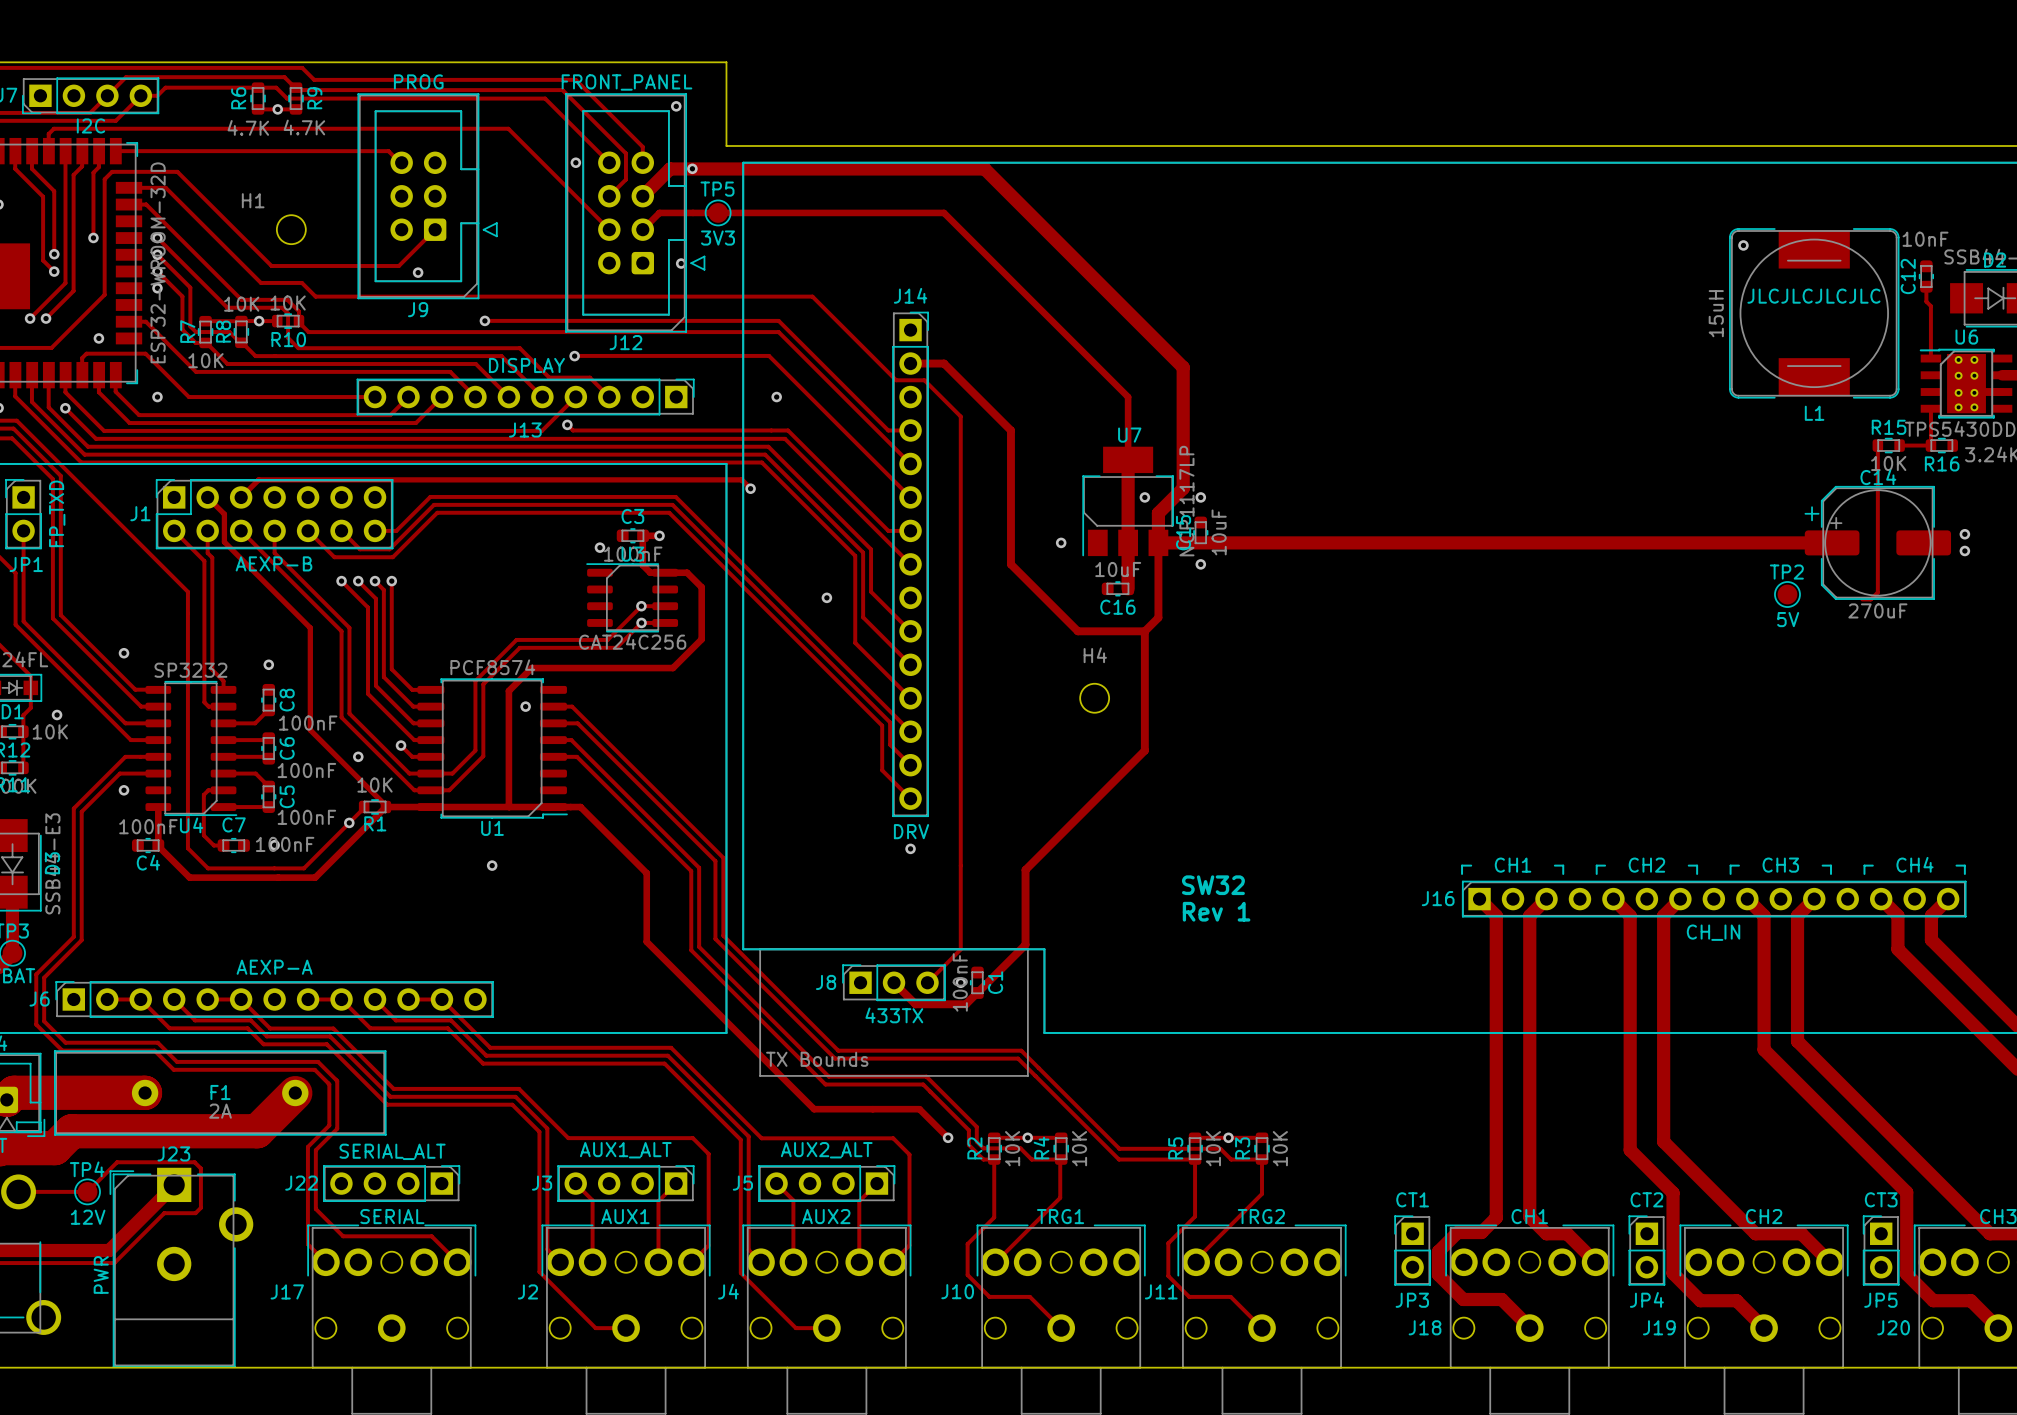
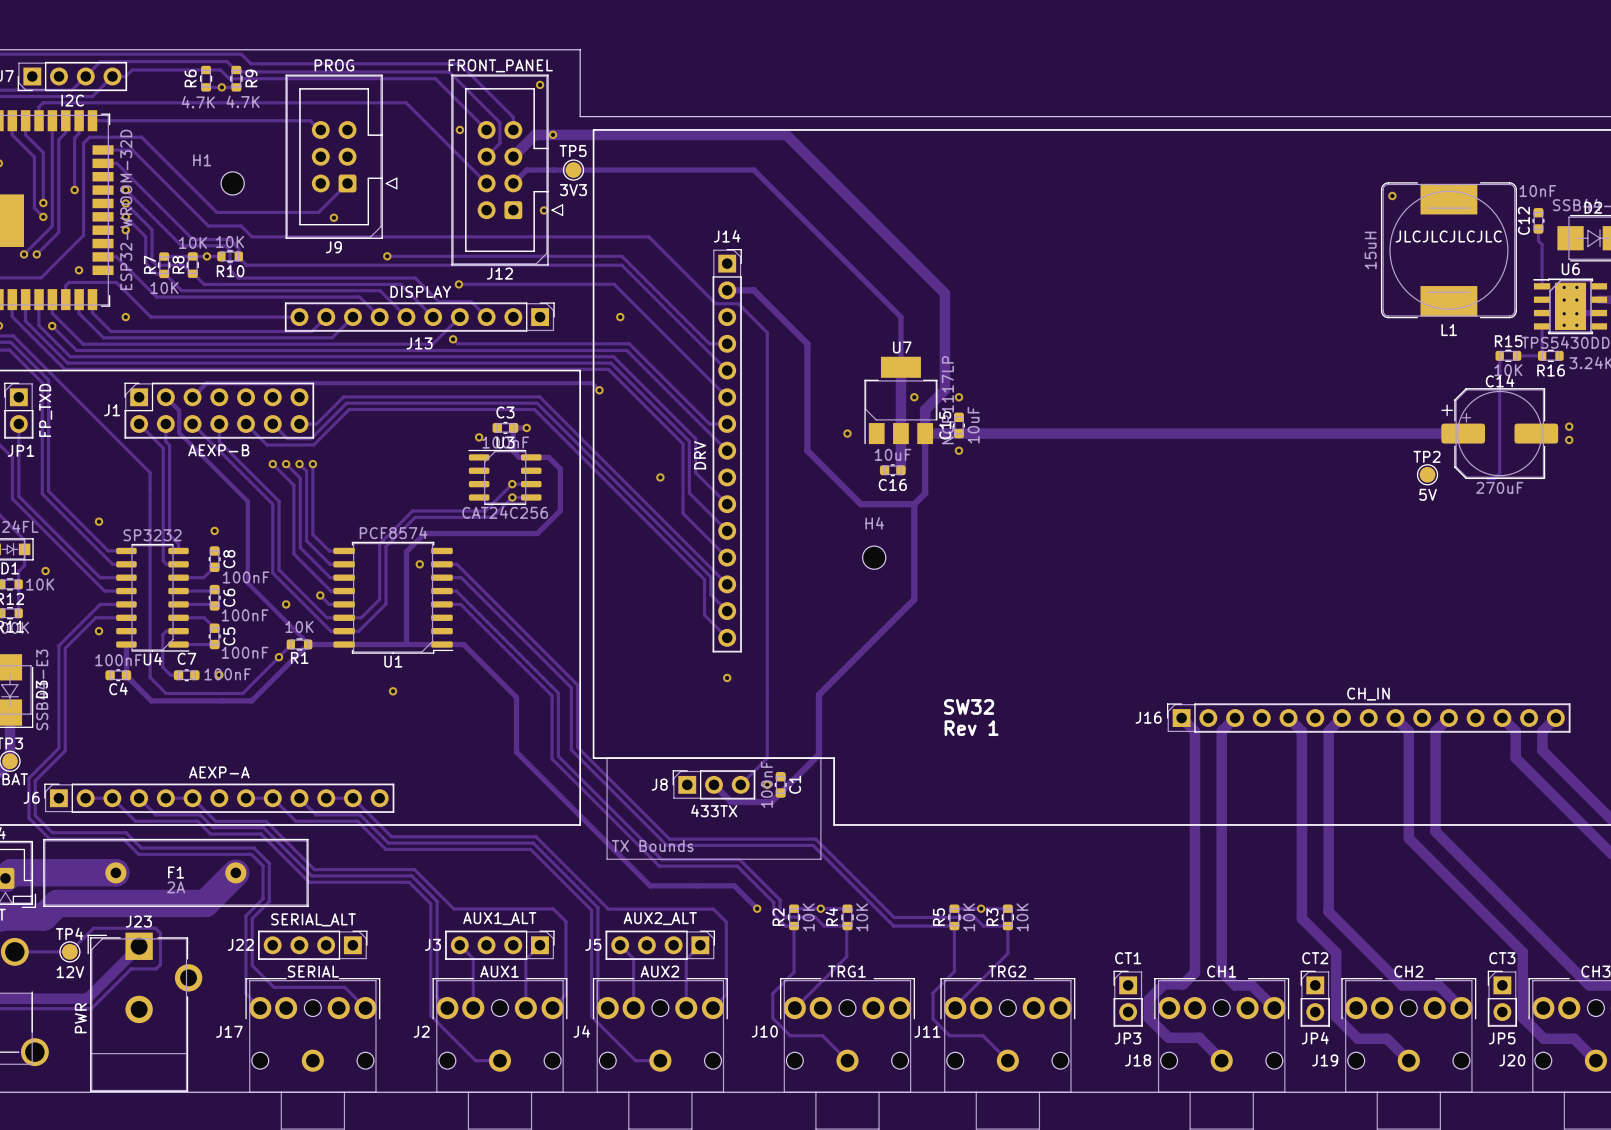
J14 value rotation: 0° (911, 831) -> 90° counterclockwise (700, 455)
J14 value position: DRV (911, 831) -> DRV (700, 455)
line: (1471, 865) (1462, 865) (1462, 873) -> none
line: (1554, 865) (1563, 865) (1563, 873) -> none
line: (1605, 865) (1596, 865) (1596, 873) -> none
line: (1688, 865) (1697, 865) (1697, 873) -> none
line: (1738, 865) (1730, 865) (1730, 873) -> none
line: (1822, 865) (1831, 865) (1831, 873) -> none
line: (1872, 865) (1864, 865) (1864, 873) -> none
line: (1956, 865) (1964, 865) (1964, 873) -> none
J16 footprint: [1462, 880, 1967, 918] -> [1166, 703, 1571, 733]
J16 value position: CH_IN (1713, 932) -> CH_IN (1368, 694)

